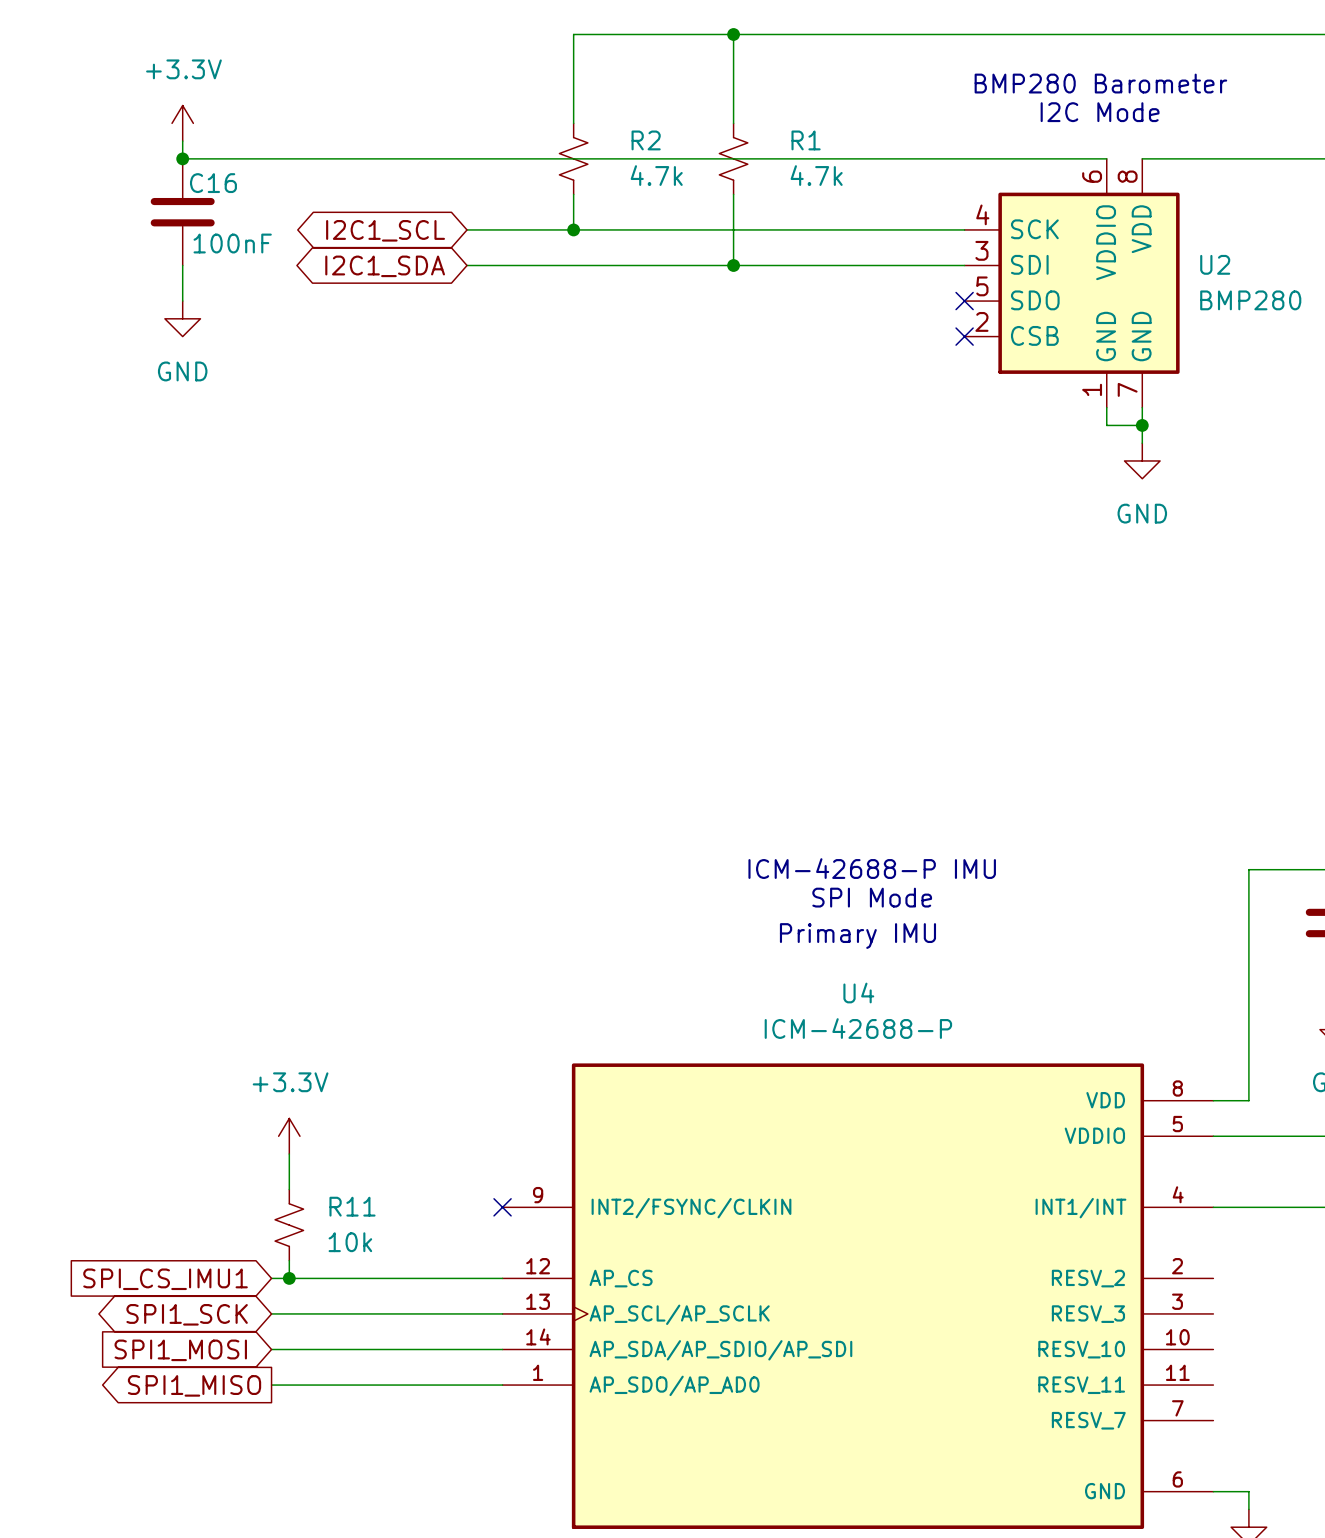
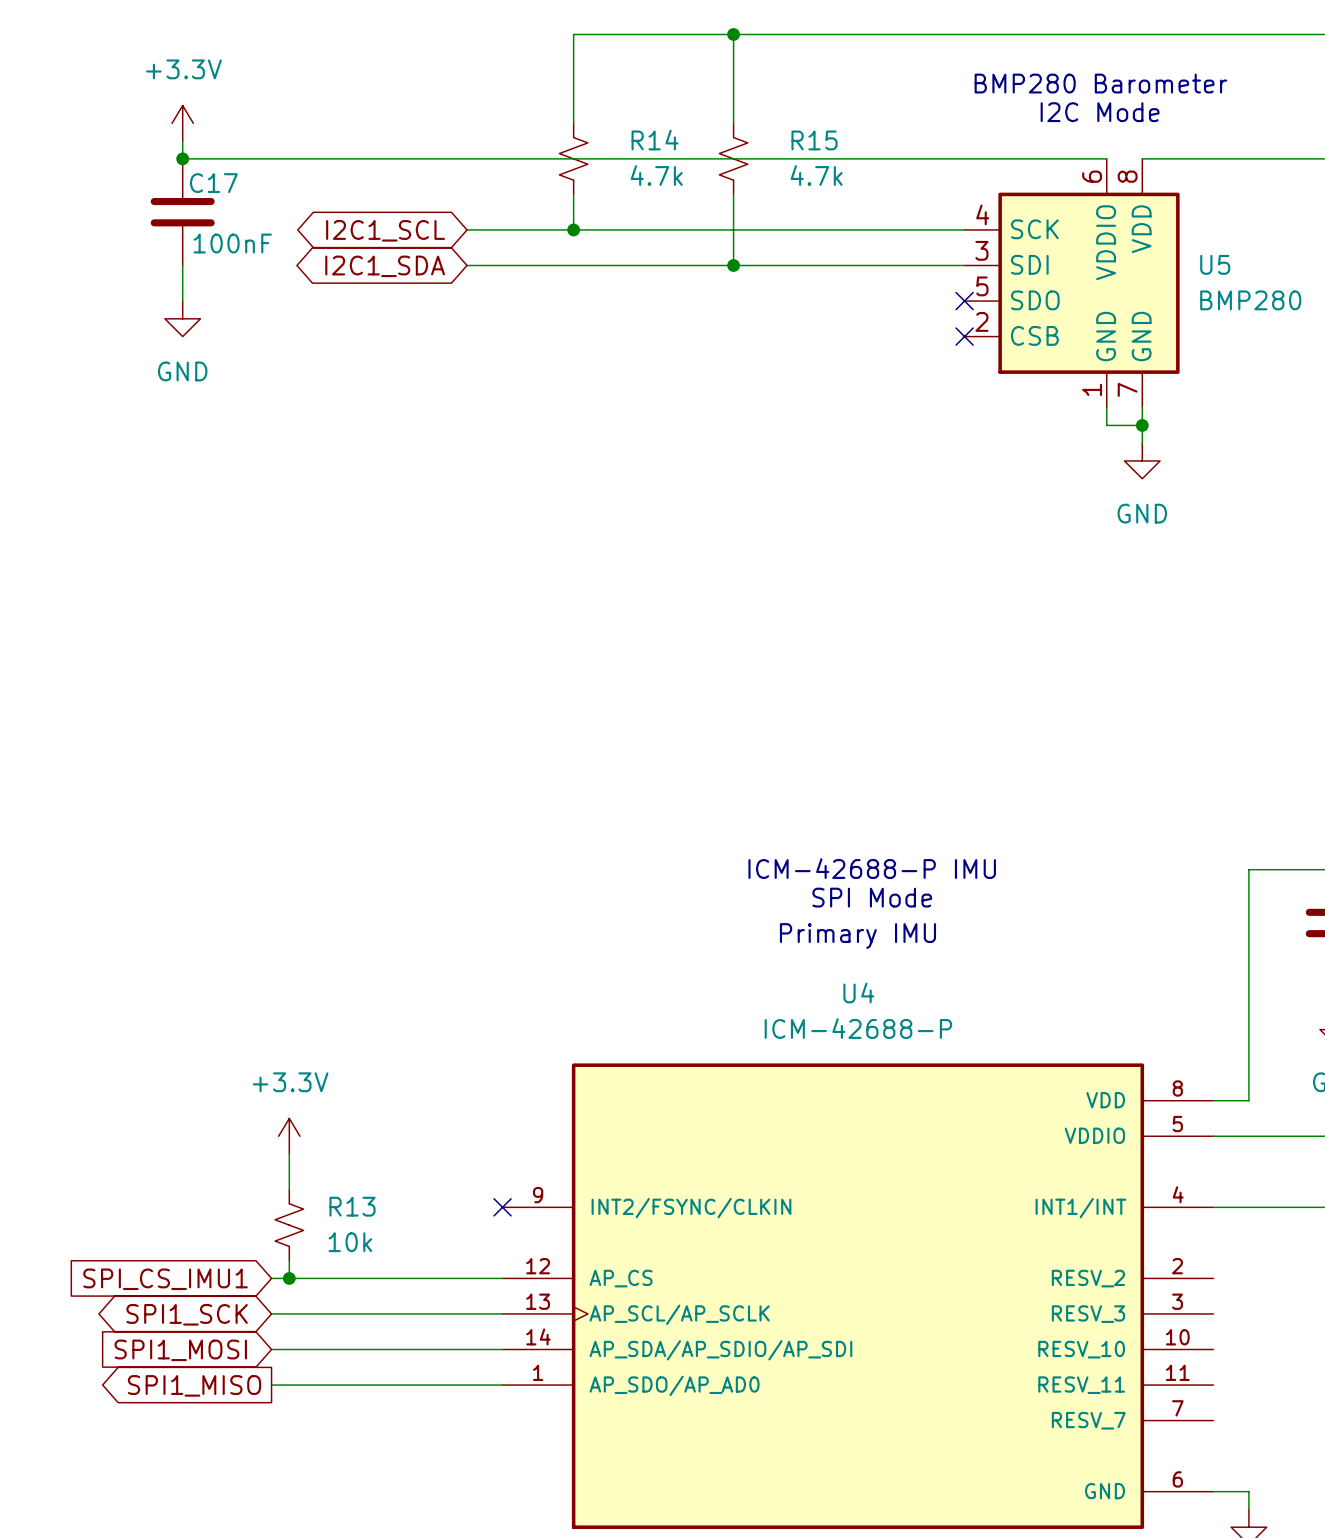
R2 name: R2 (646, 140) -> R14 (655, 140)
R1 name: R1 (806, 140) -> R15 (814, 140)
C16 name: C16 (213, 183) -> C17 (213, 183)
U2 name: U2 (1215, 264) -> U5 (1215, 264)
R11 name: R11 (352, 1206) -> R13 (352, 1206)

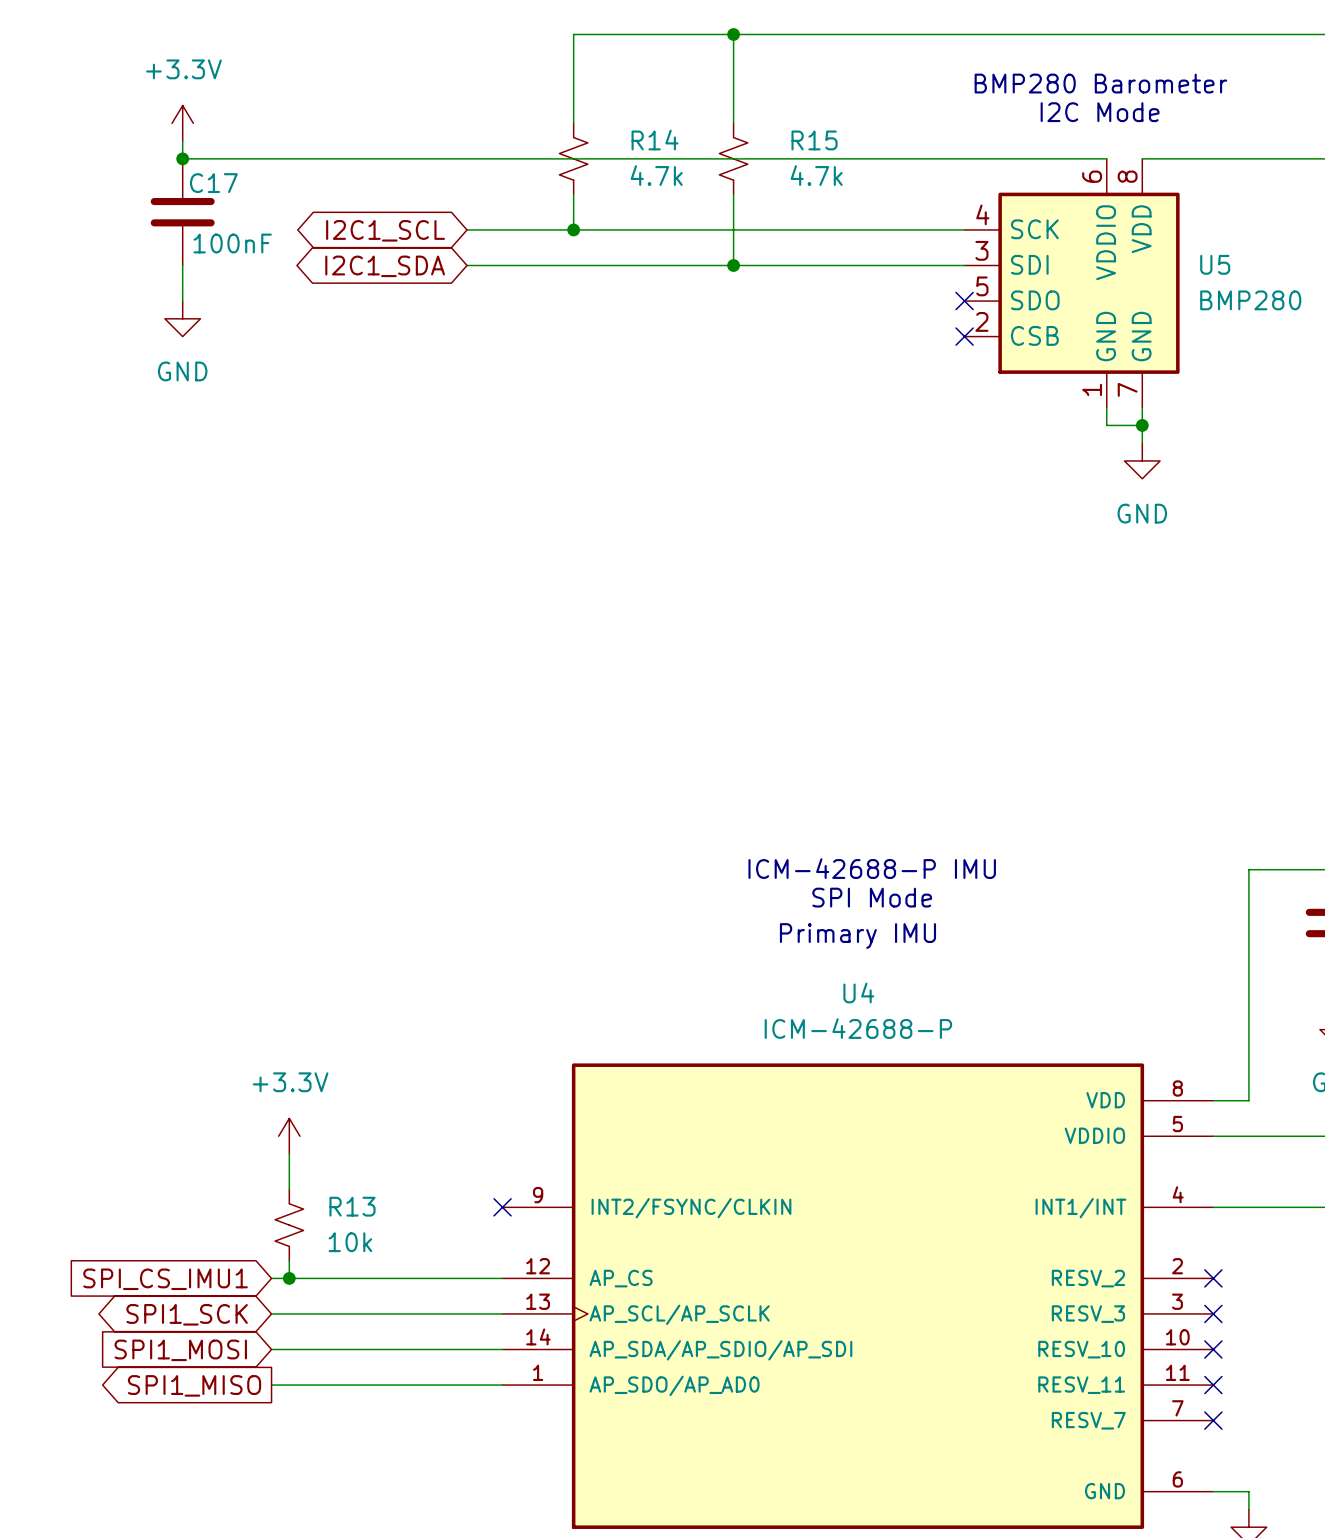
no-connect mark: none -> (1213, 1278)
no-connect mark: none -> (1213, 1313)
no-connect mark: none -> (1213, 1349)
no-connect mark: none -> (1213, 1385)
no-connect mark: none -> (1213, 1420)

